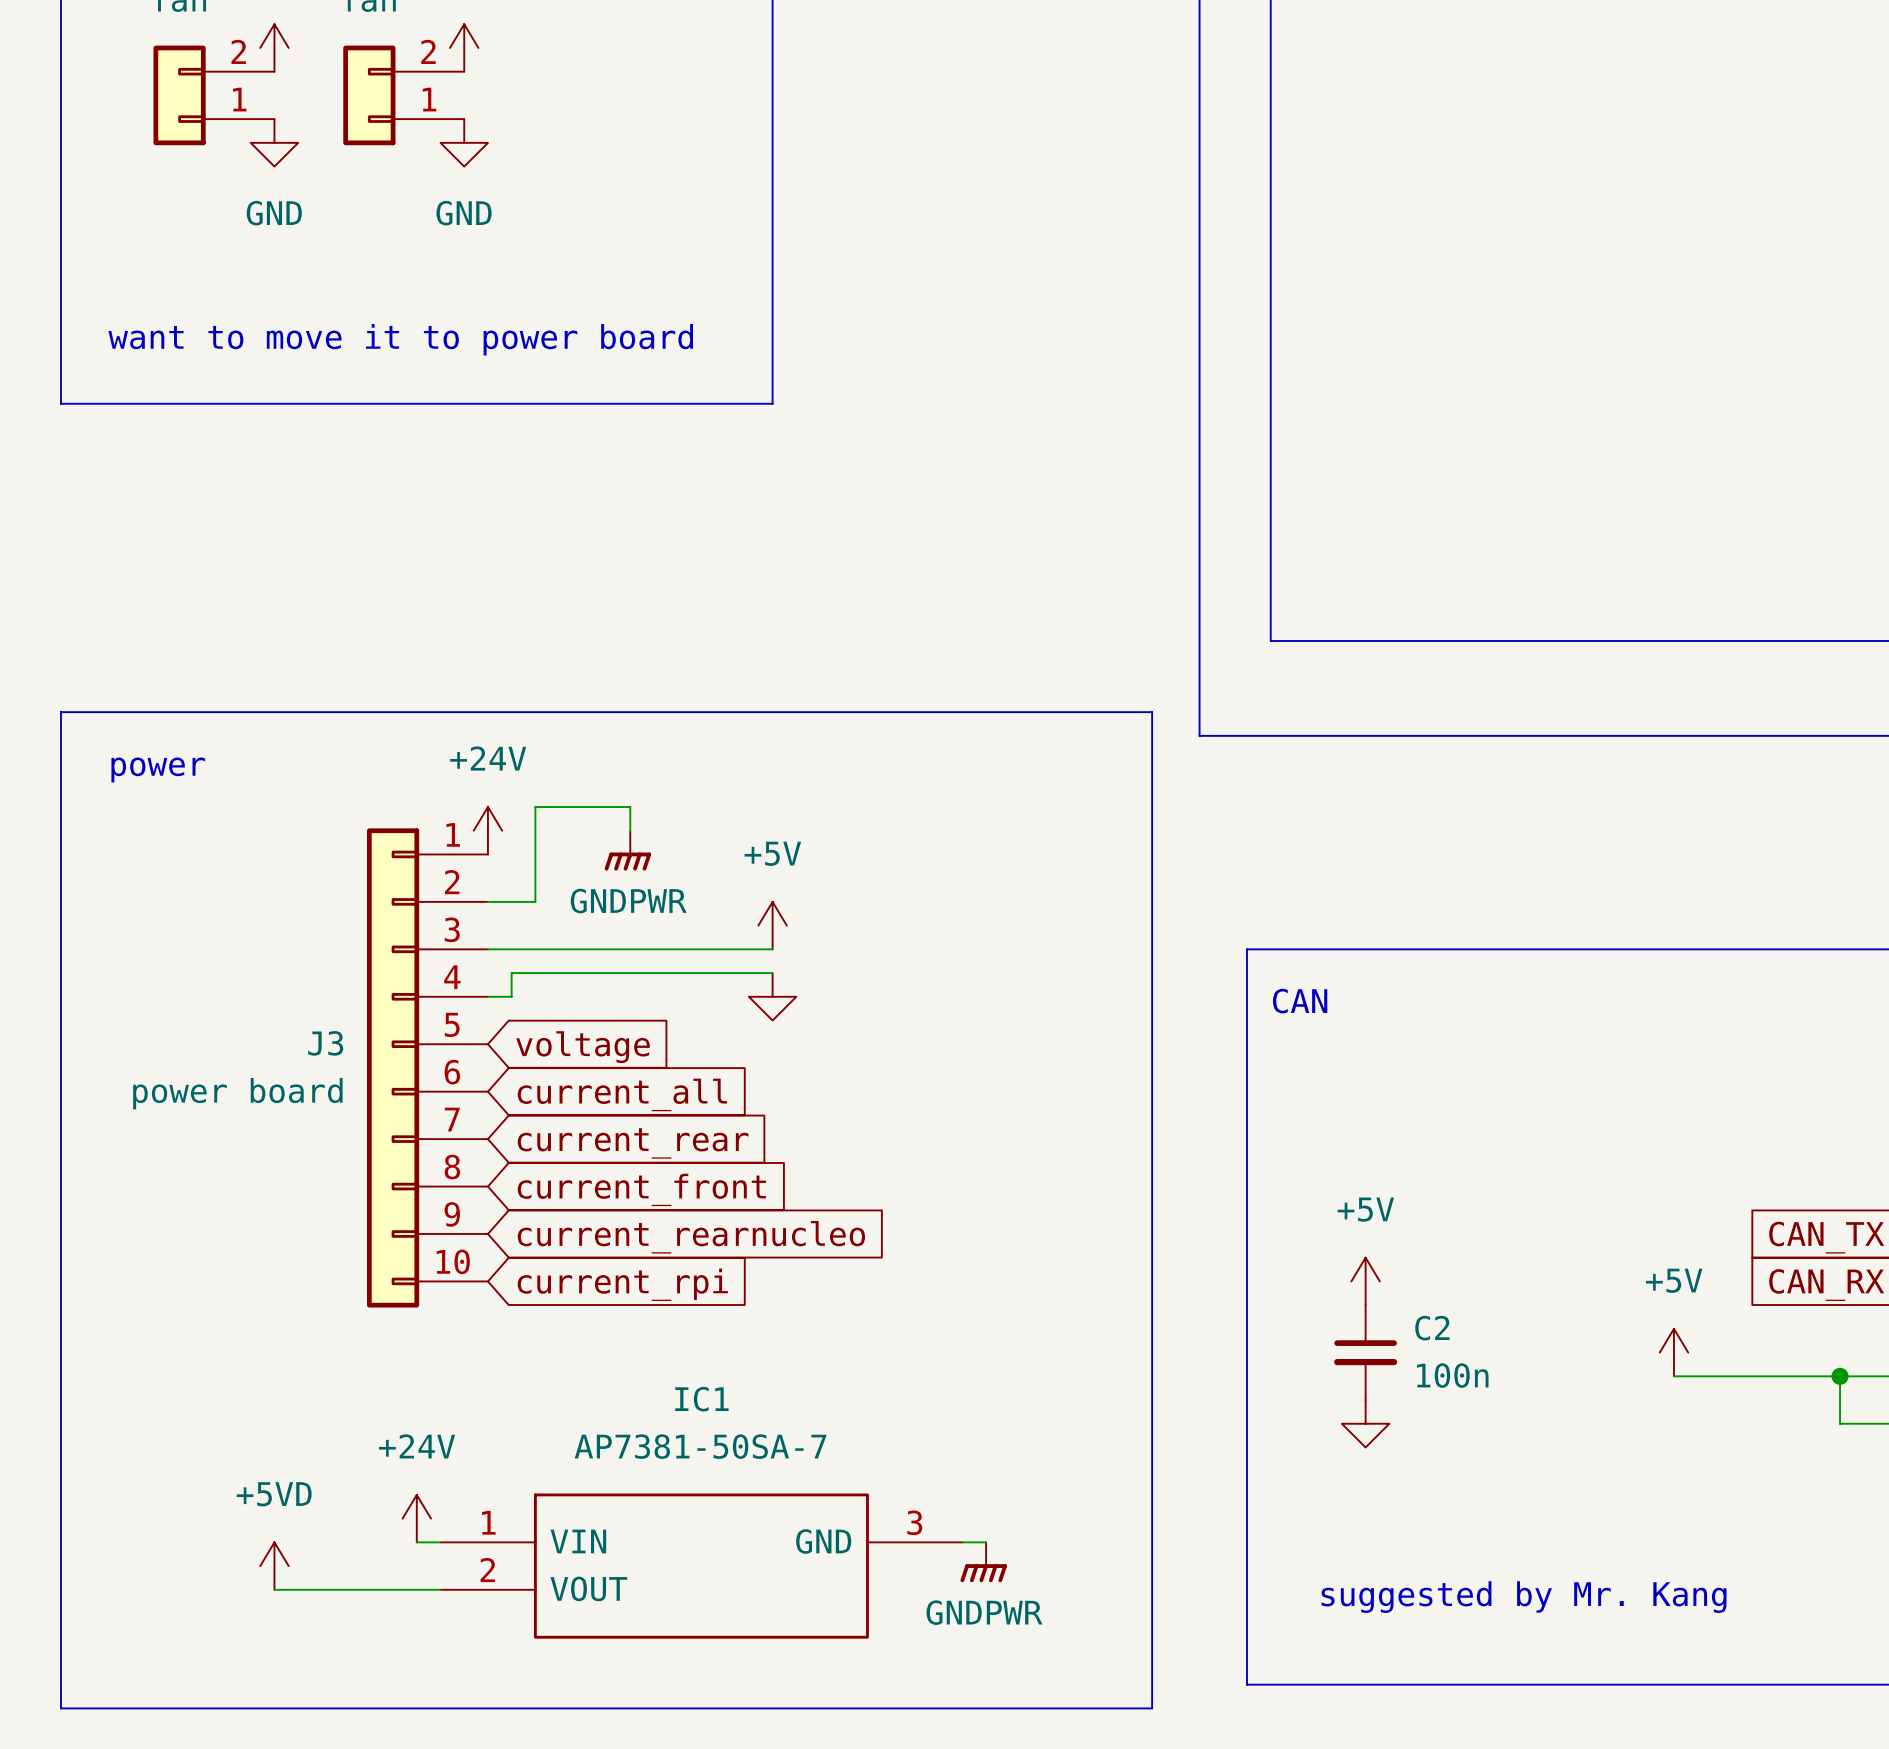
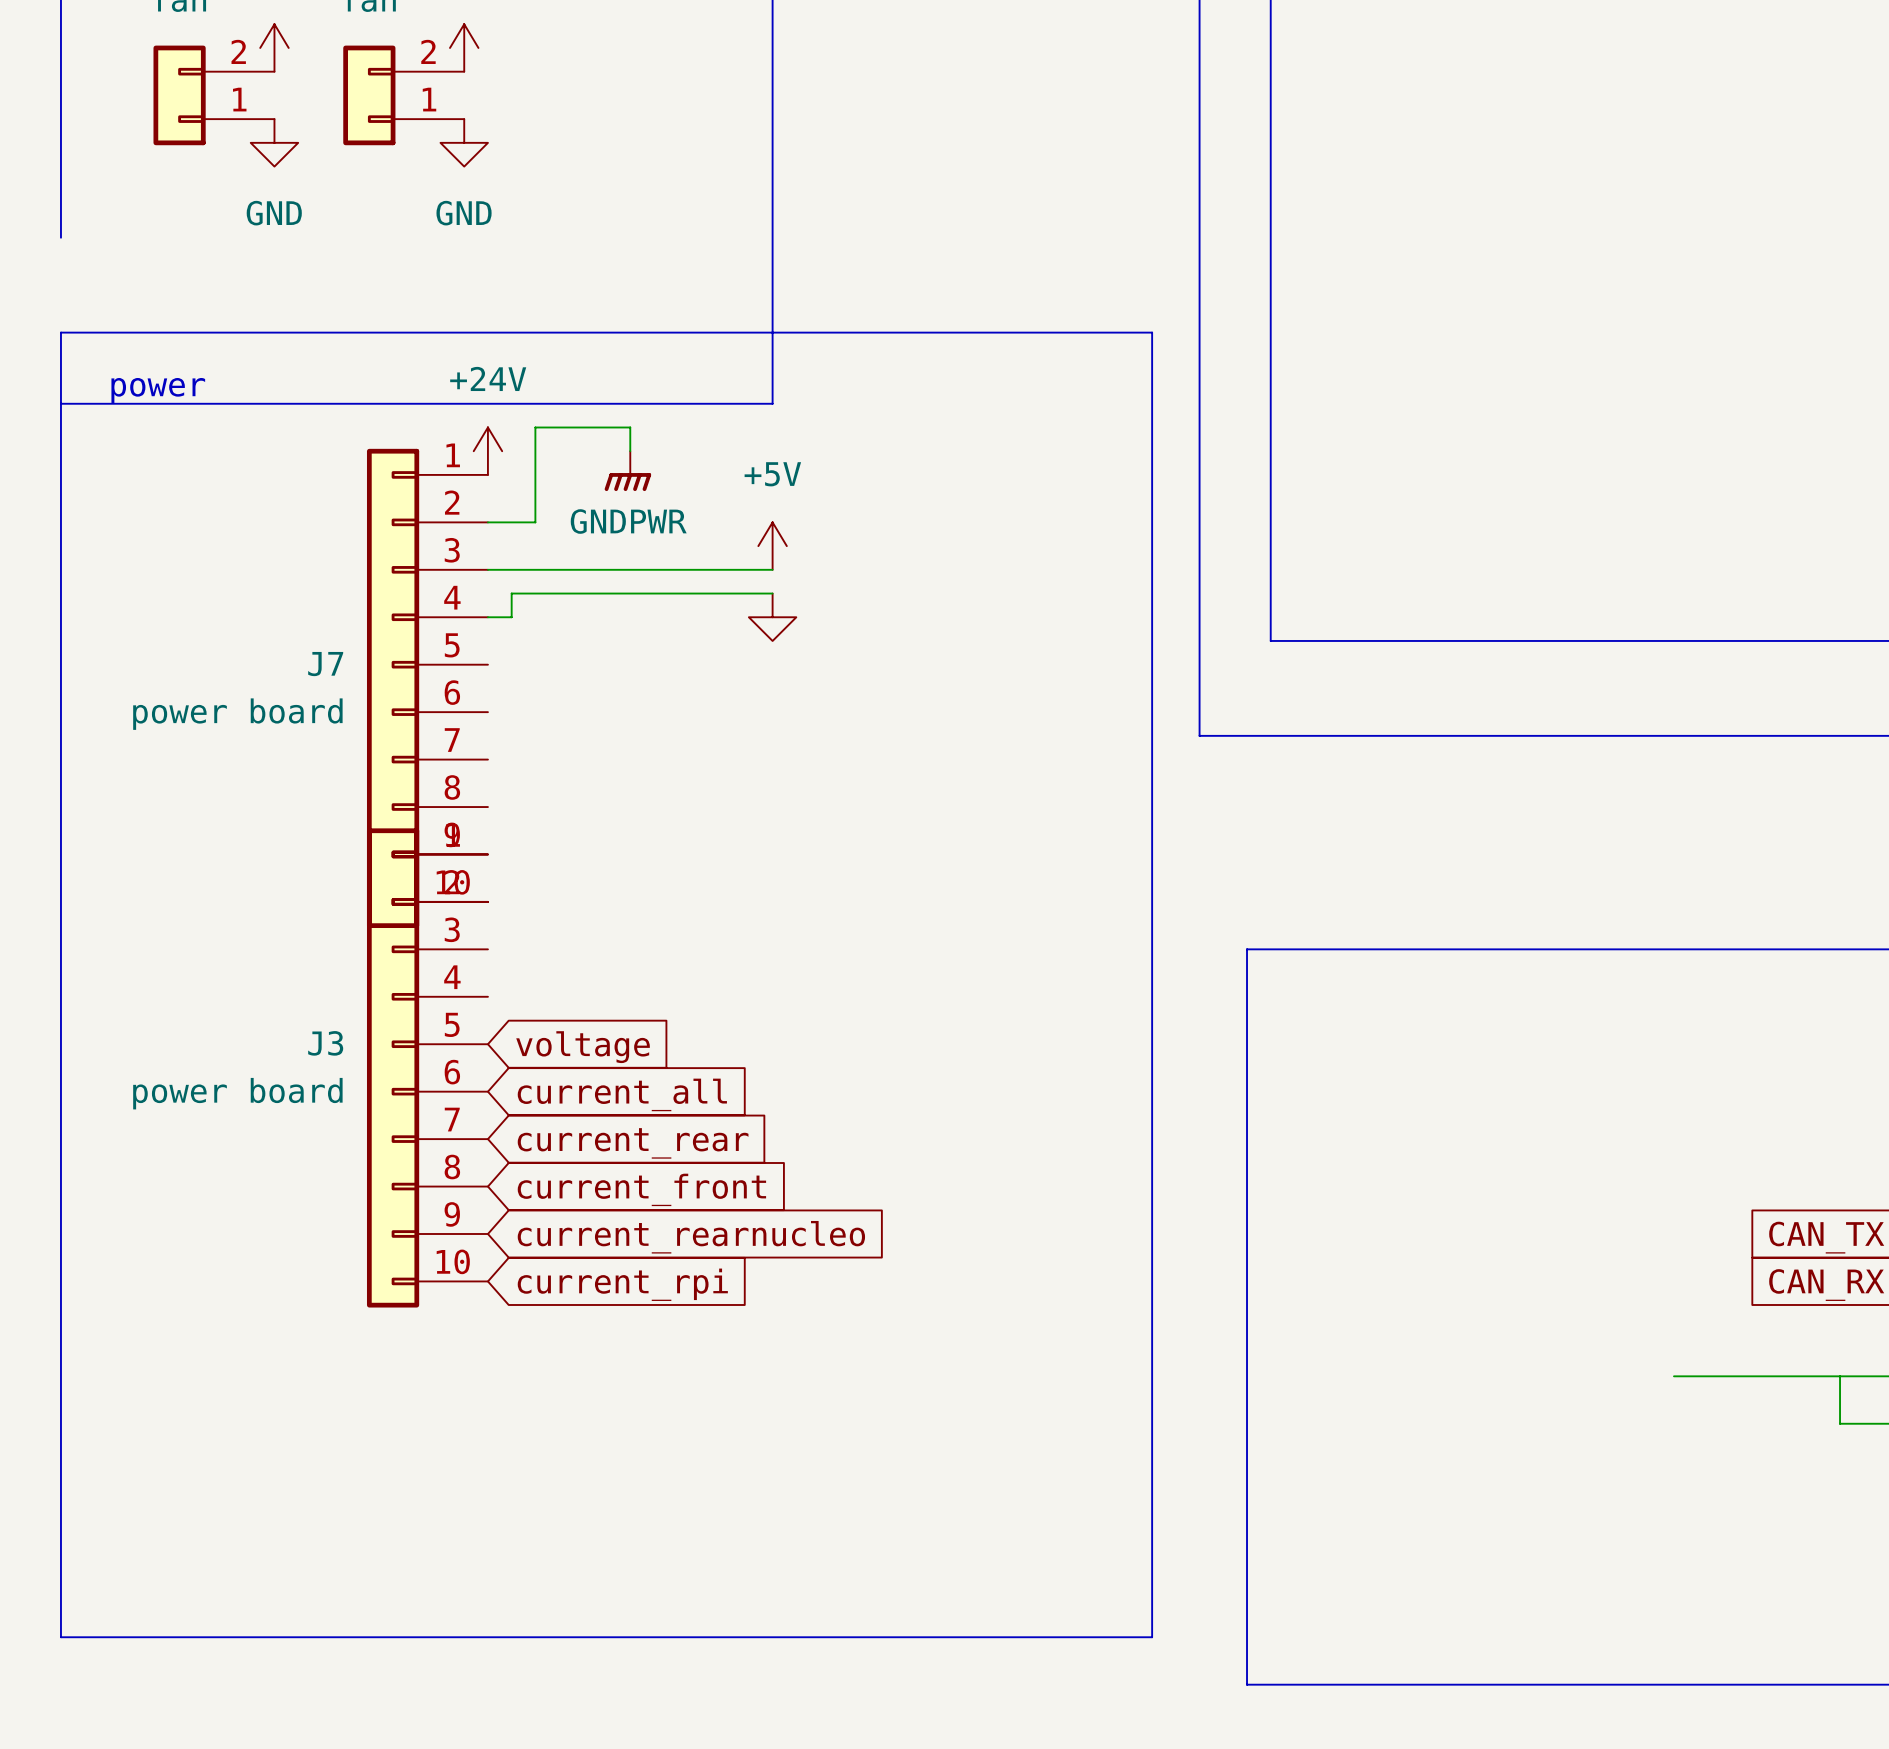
line: (60, 237) (60, 332) -> none
text: want to move it to power board (400, 339) -> none
line: none -> (60, 403) (60, 712)
J7: none -> power board (427, 688)
line: (60, 712) (1152, 712) -> (60, 332) (1152, 332) (1152, 712)
text position: power (158, 770) -> power (158, 390)
power symbol position: +24V (487, 830) -> +24V (487, 451)
wire: (630, 830) (630, 807) (535, 807) (535, 901) (487, 901) -> (630, 451) (630, 427) (535, 427) (535, 522) (487, 522)
power symbol position: GNDPWR (627, 850) -> GNDPWR (627, 471)
power symbol position: +5V (772, 925) -> +5V (772, 546)
wire: (487, 949) (772, 949) -> (487, 569) (772, 569)
wire: (772, 973) (511, 973) (511, 996) (487, 996) -> (772, 593) (511, 593) (511, 617) (487, 617)
power symbol position: (772, 996) -> (772, 617)
text: CAN (1300, 1001) -> none
power symbol: +5V (1365, 1281) -> none
C2: 100n (1365, 1352) -> none
power symbol: +5V (1673, 1352) -> none
junction: (1840, 1376) -> none
power symbol: (1365, 1423) -> none
power symbol: +24V (416, 1518) -> none
wire: (416, 1542) (440, 1542) -> none
wire: (962, 1542) (986, 1542) -> none
power symbol: GNDPWR (983, 1562) -> none
power symbol: +5VD (274, 1566) -> none
IC1: AP7381-50SA-7 (701, 1566) -> none
wire: (274, 1589) (440, 1589) -> none
text: suggested by Mr. Kang (1524, 1597) -> none
line: (60, 1637) (60, 1708) (1152, 1708) (1152, 1637) -> (60, 1637) (1152, 1637)

